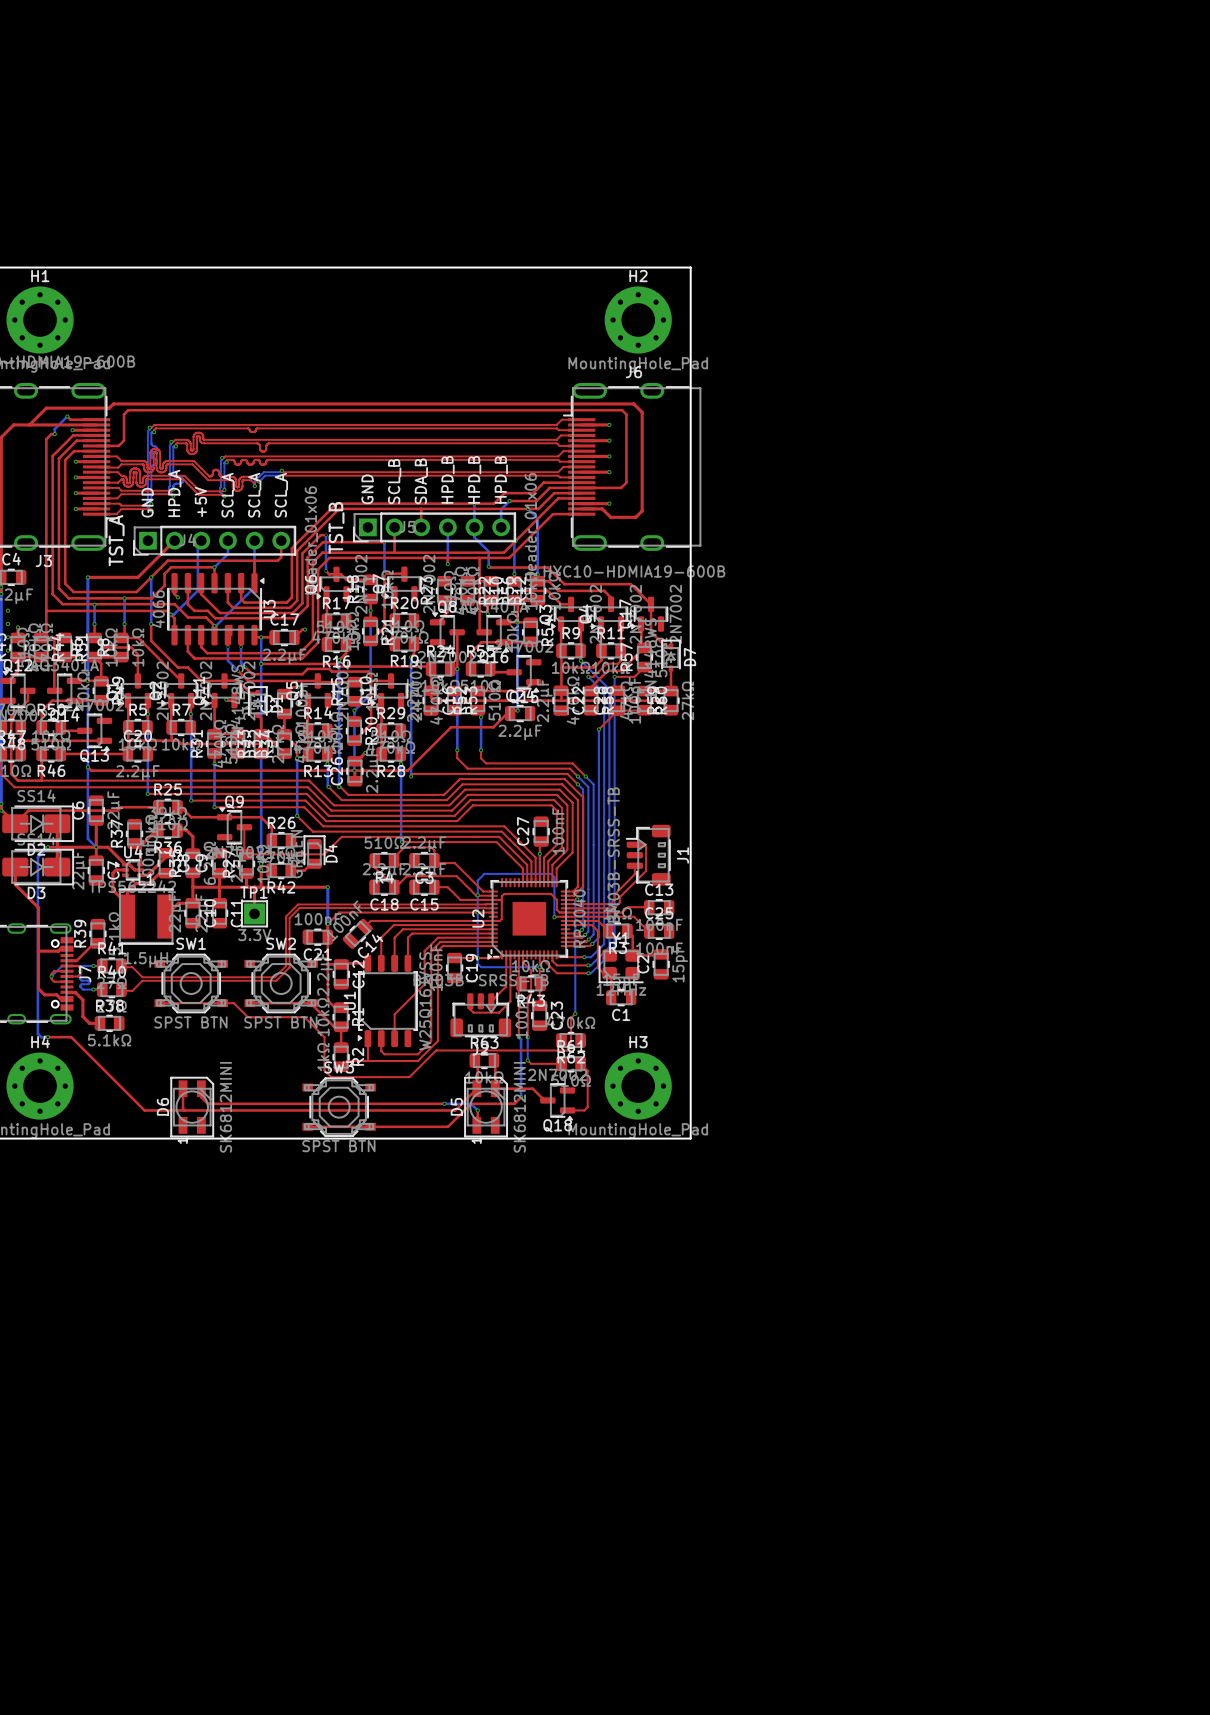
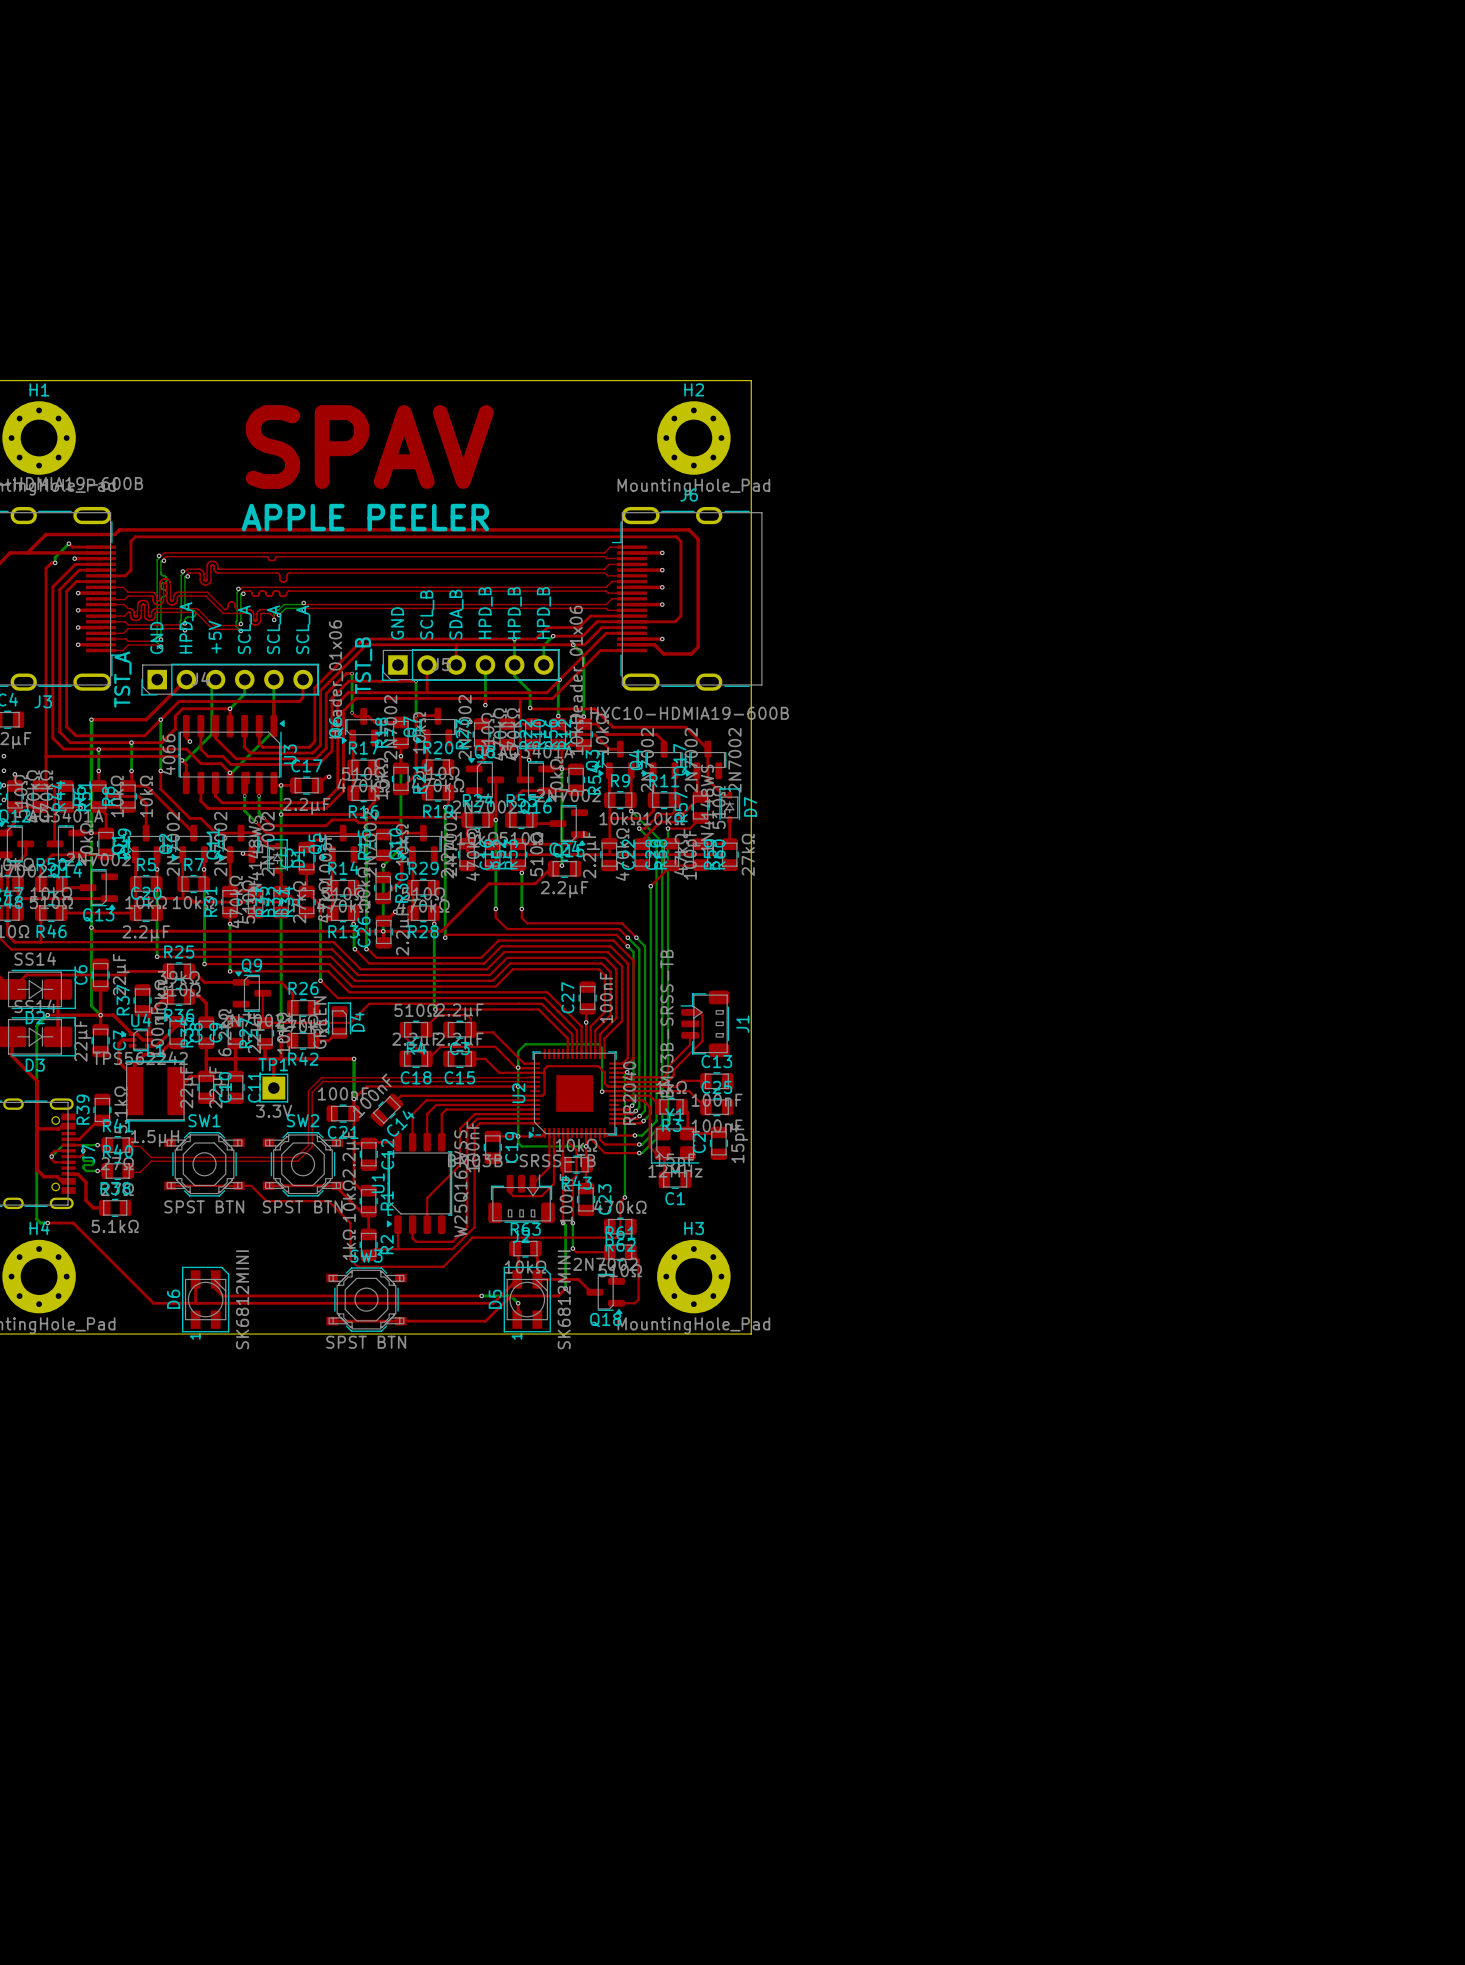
text: none -> SPAV (369, 447)
text: none -> APPLE PEELER (365, 517)

